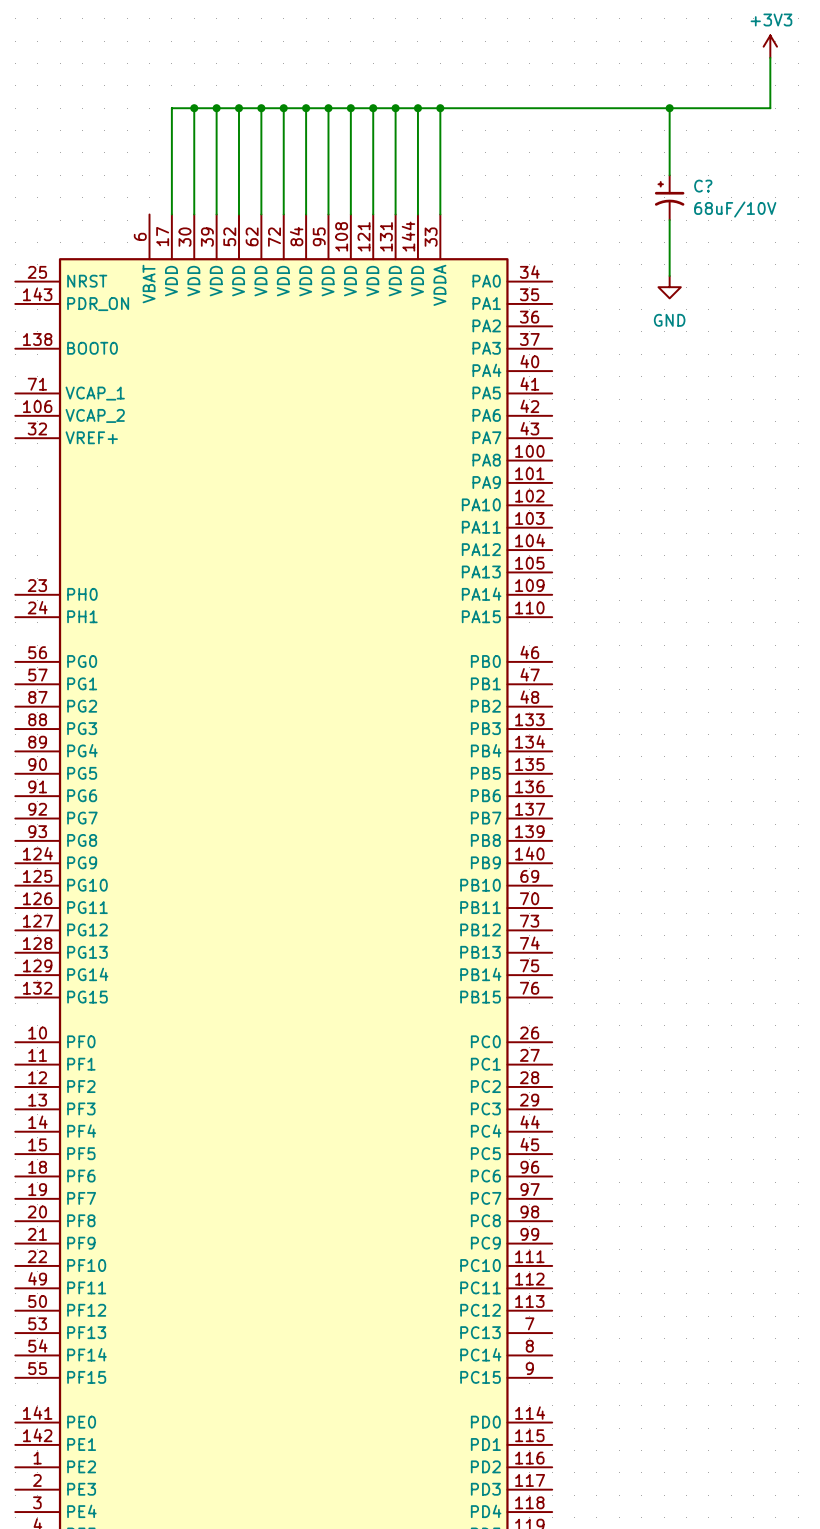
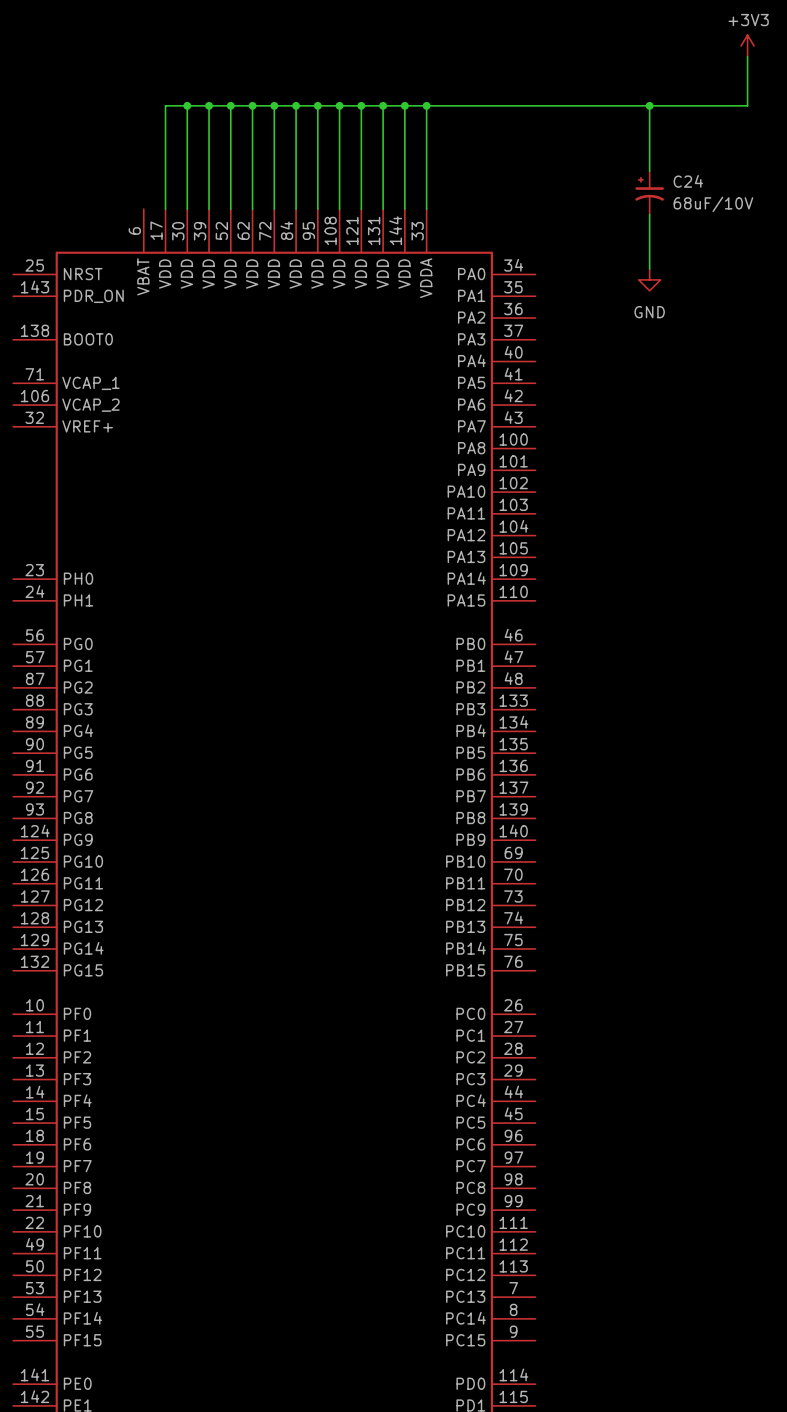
C? name: C? (703, 186) -> C24 (688, 181)

